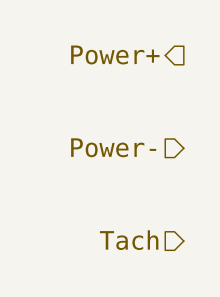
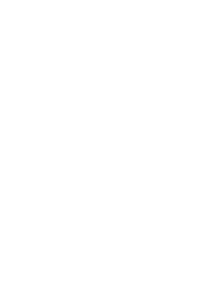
hierarchical label: Power+ (115, 54) -> none
hierarchical label: Power- (113, 147) -> none
hierarchical label: Tach (129, 240) -> none

